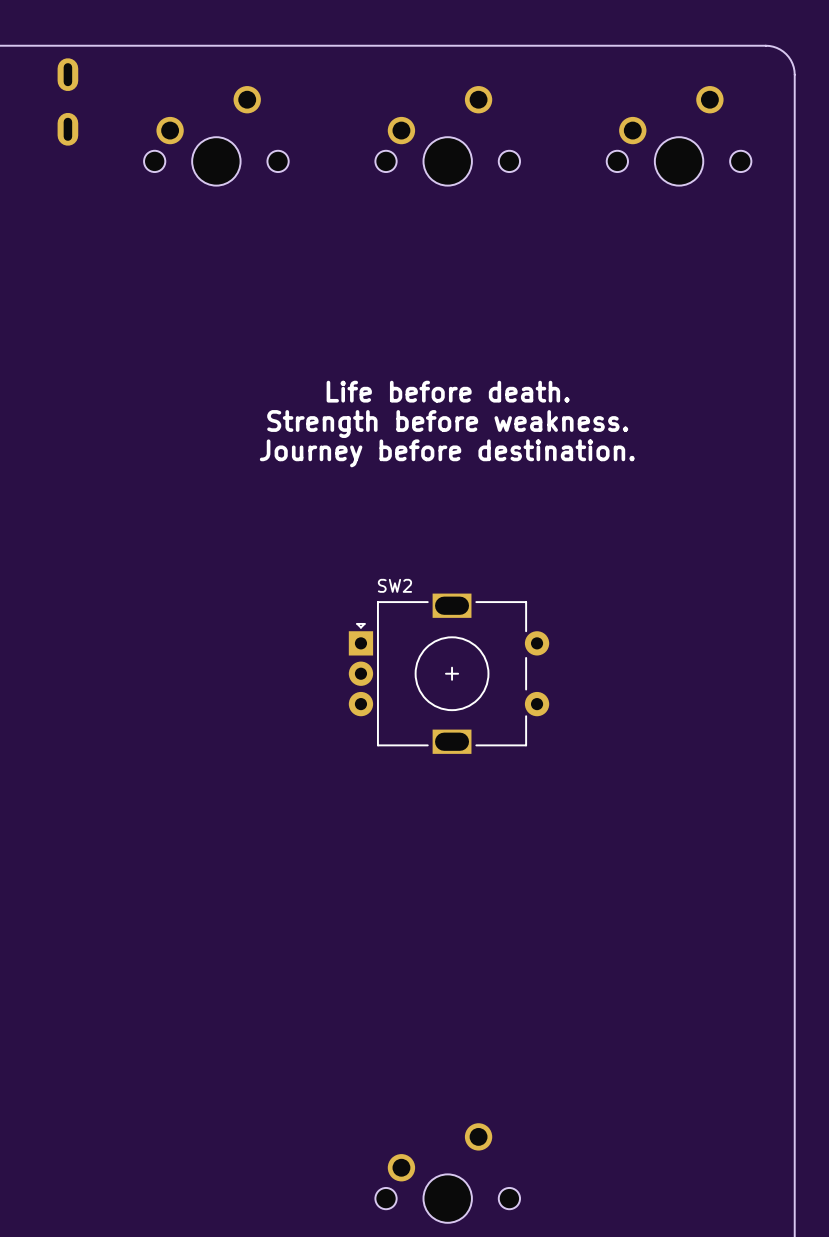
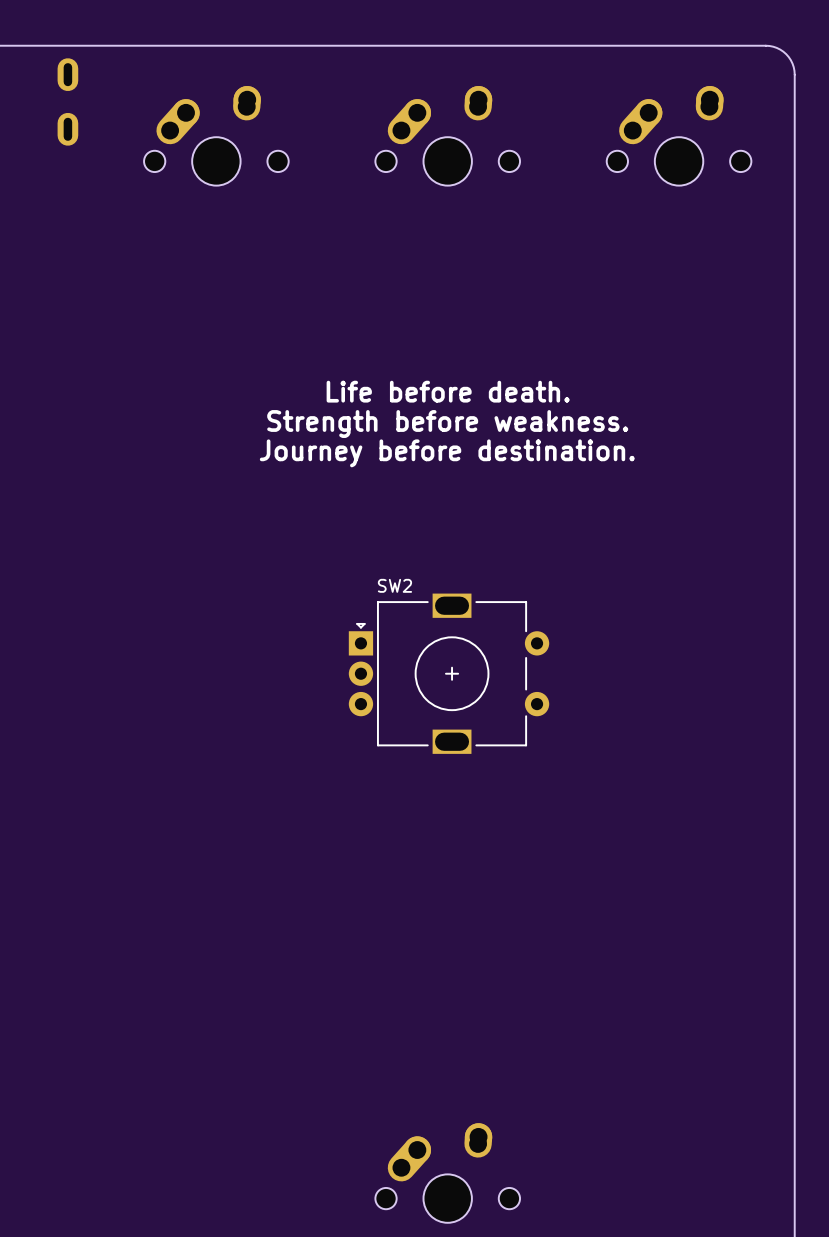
part footprint: [144, 86, 289, 186] -> [144, 86, 289, 186]
part footprint: [375, 86, 521, 186] -> [375, 86, 521, 186]
part footprint: [606, 86, 752, 186] -> [606, 86, 752, 186]
part footprint: [375, 1123, 521, 1223] -> [375, 1123, 521, 1223]

